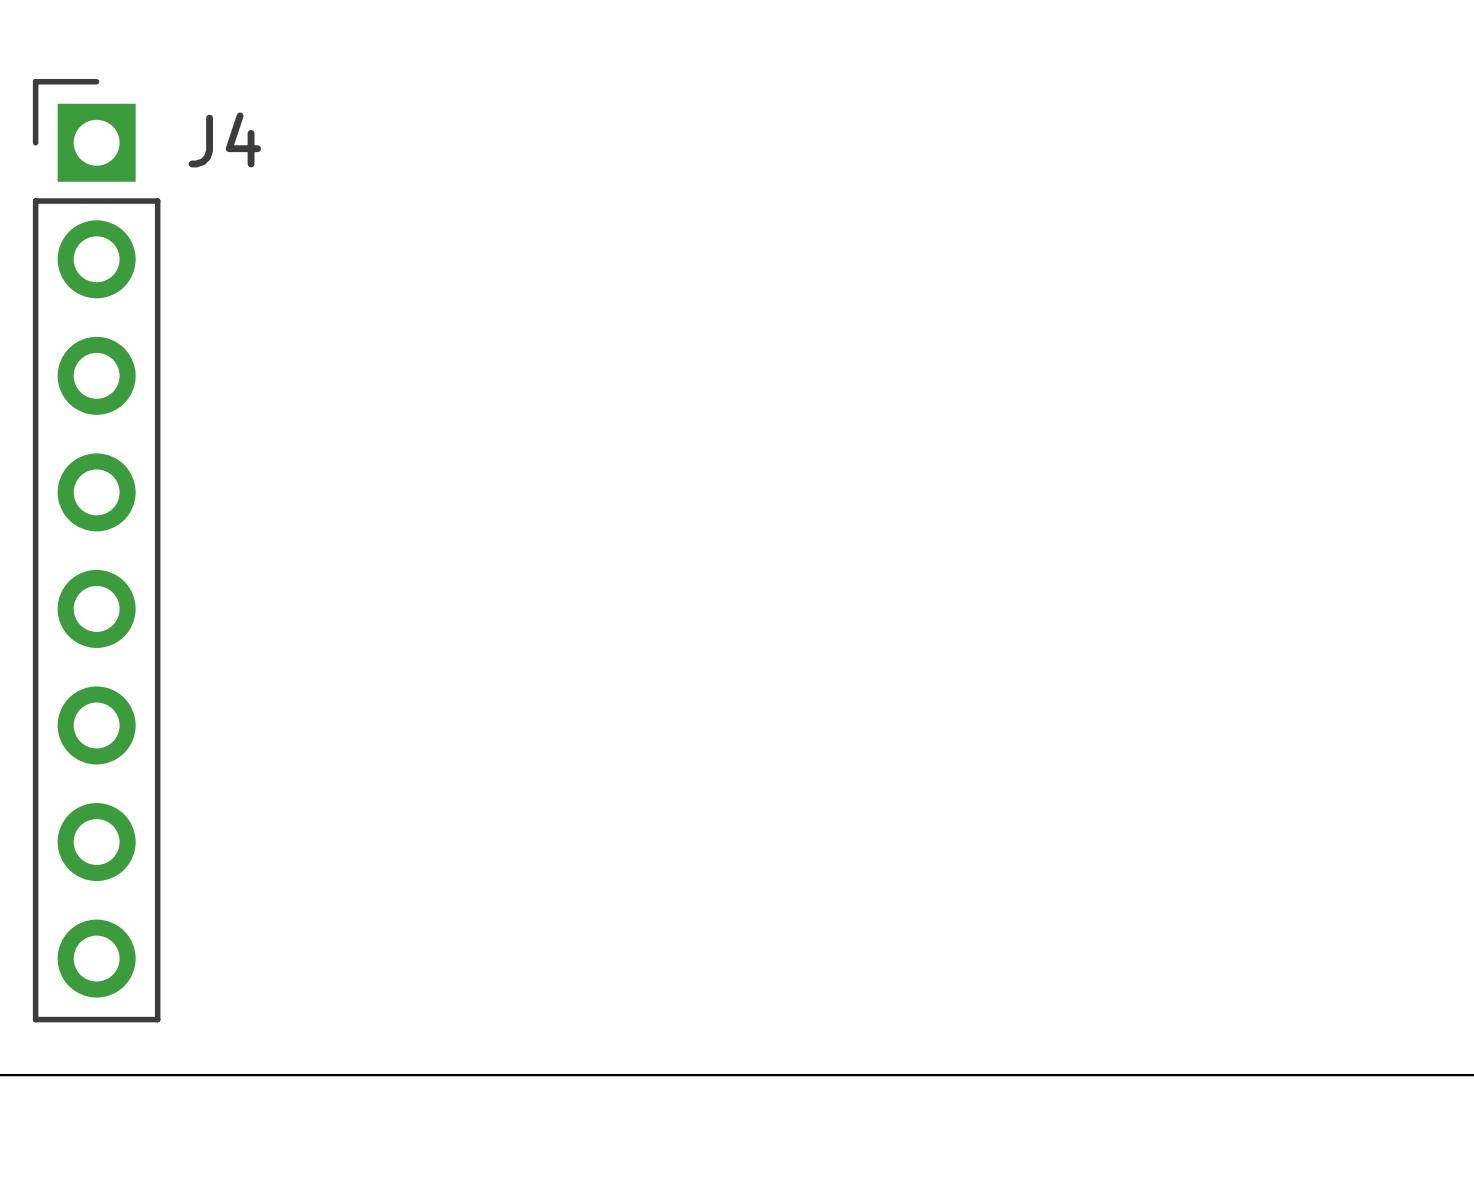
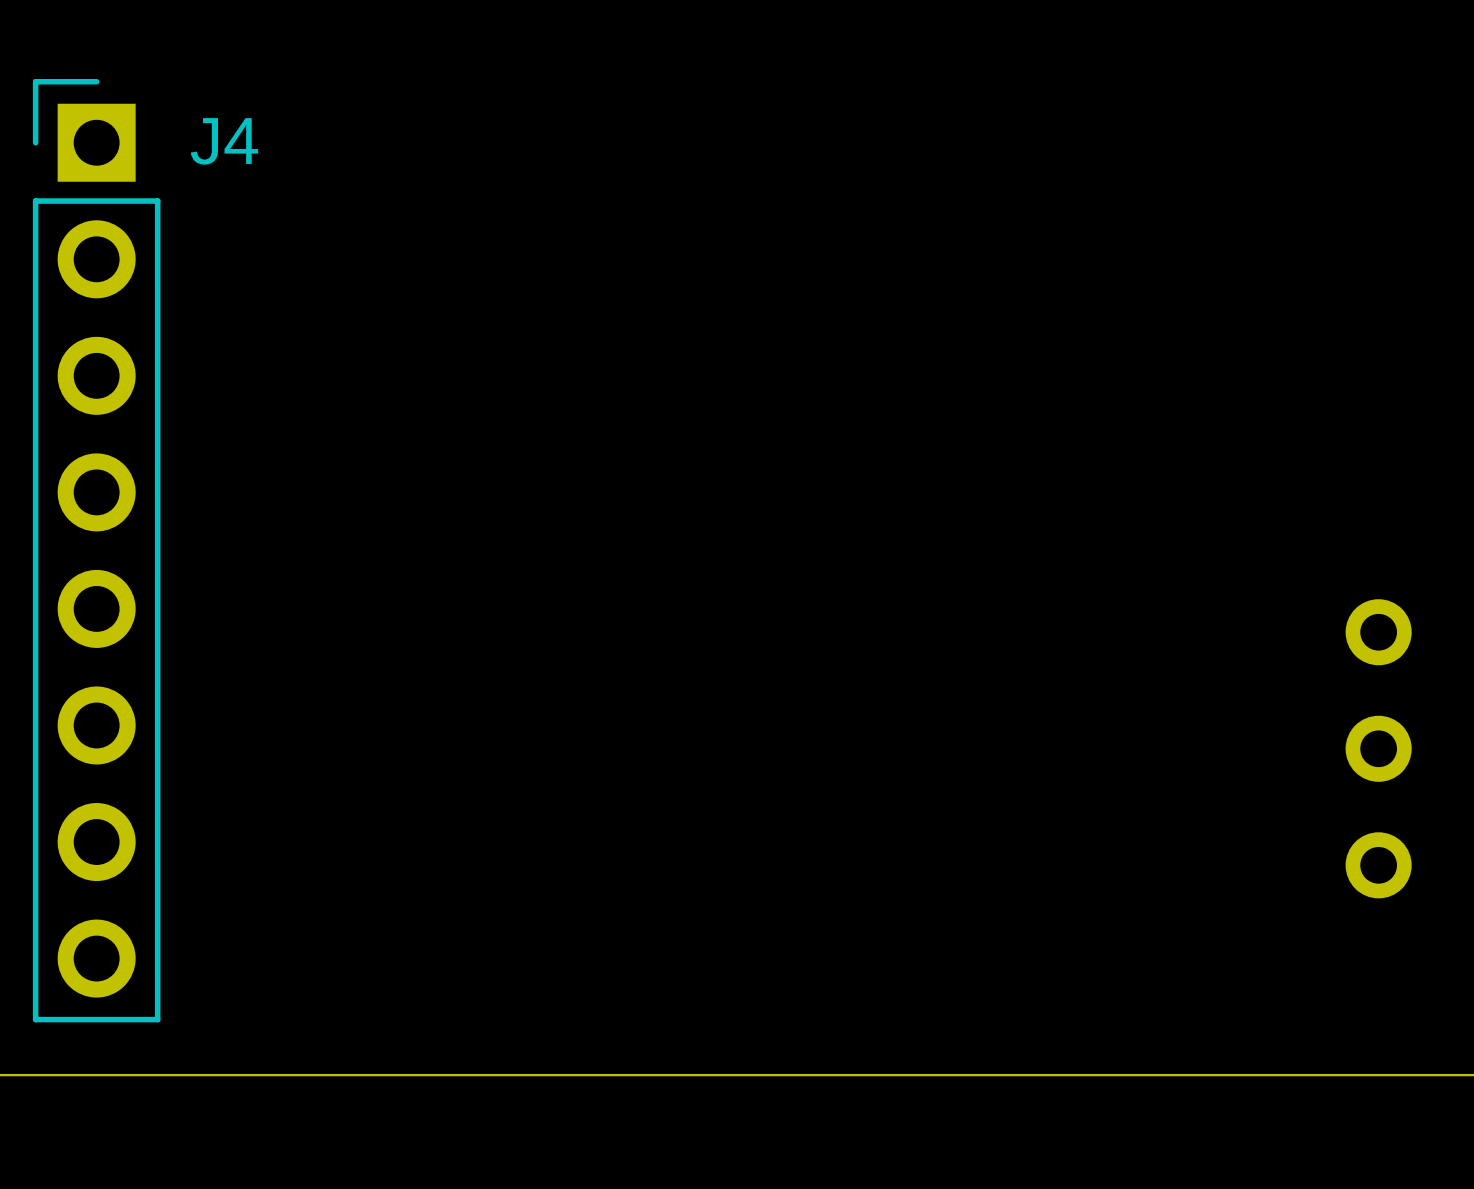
part: none -> (1378, 748)

